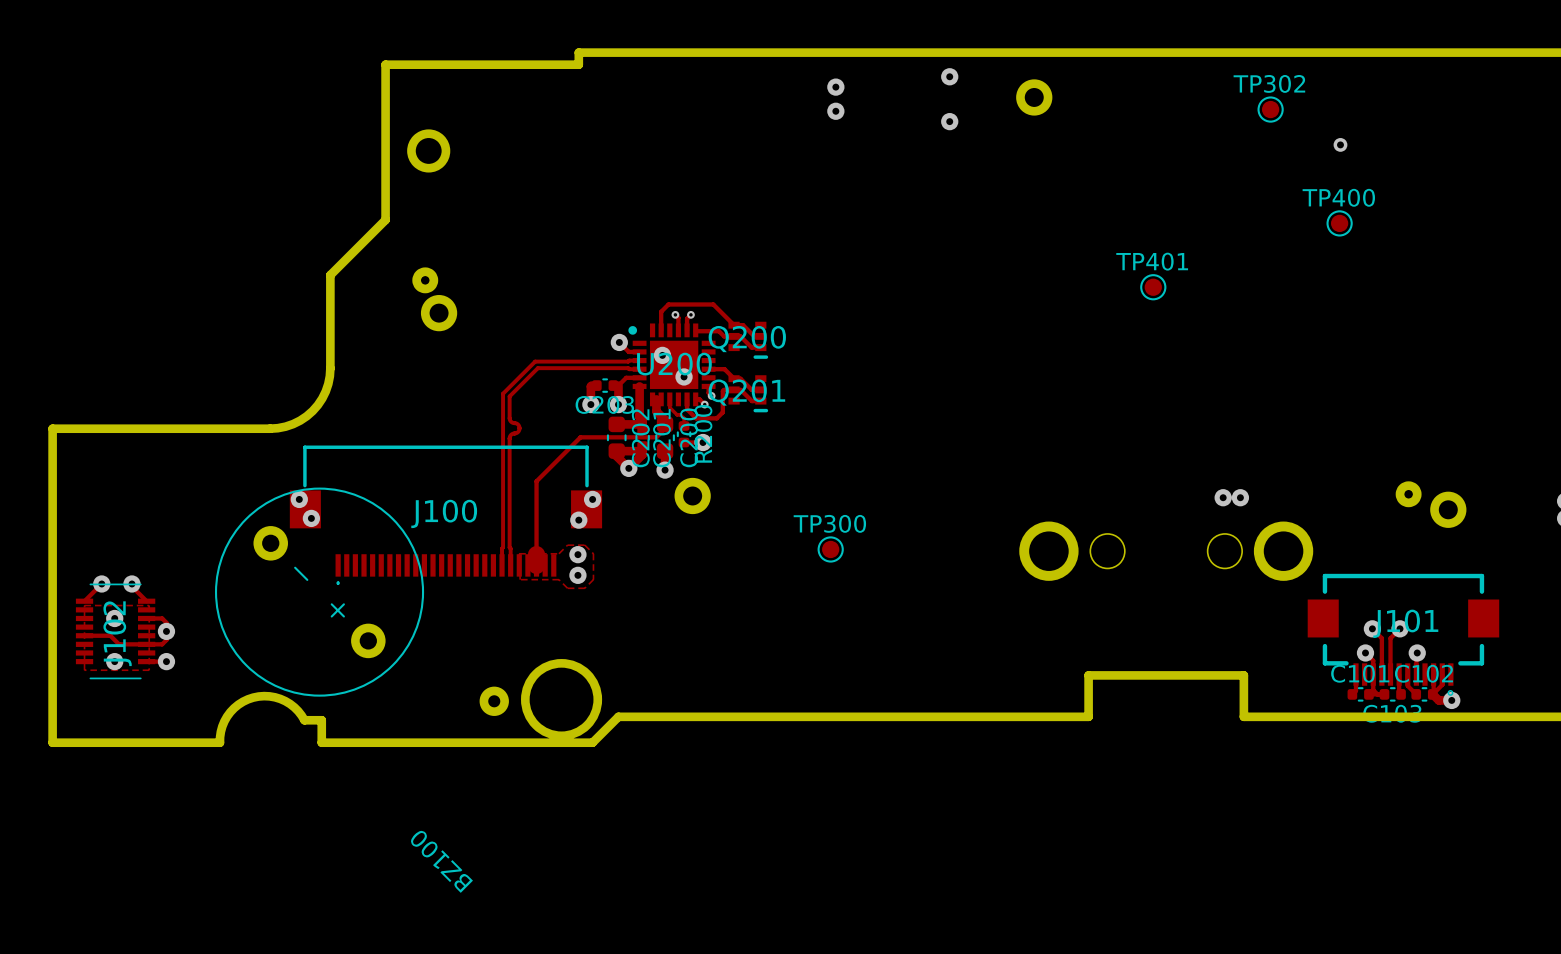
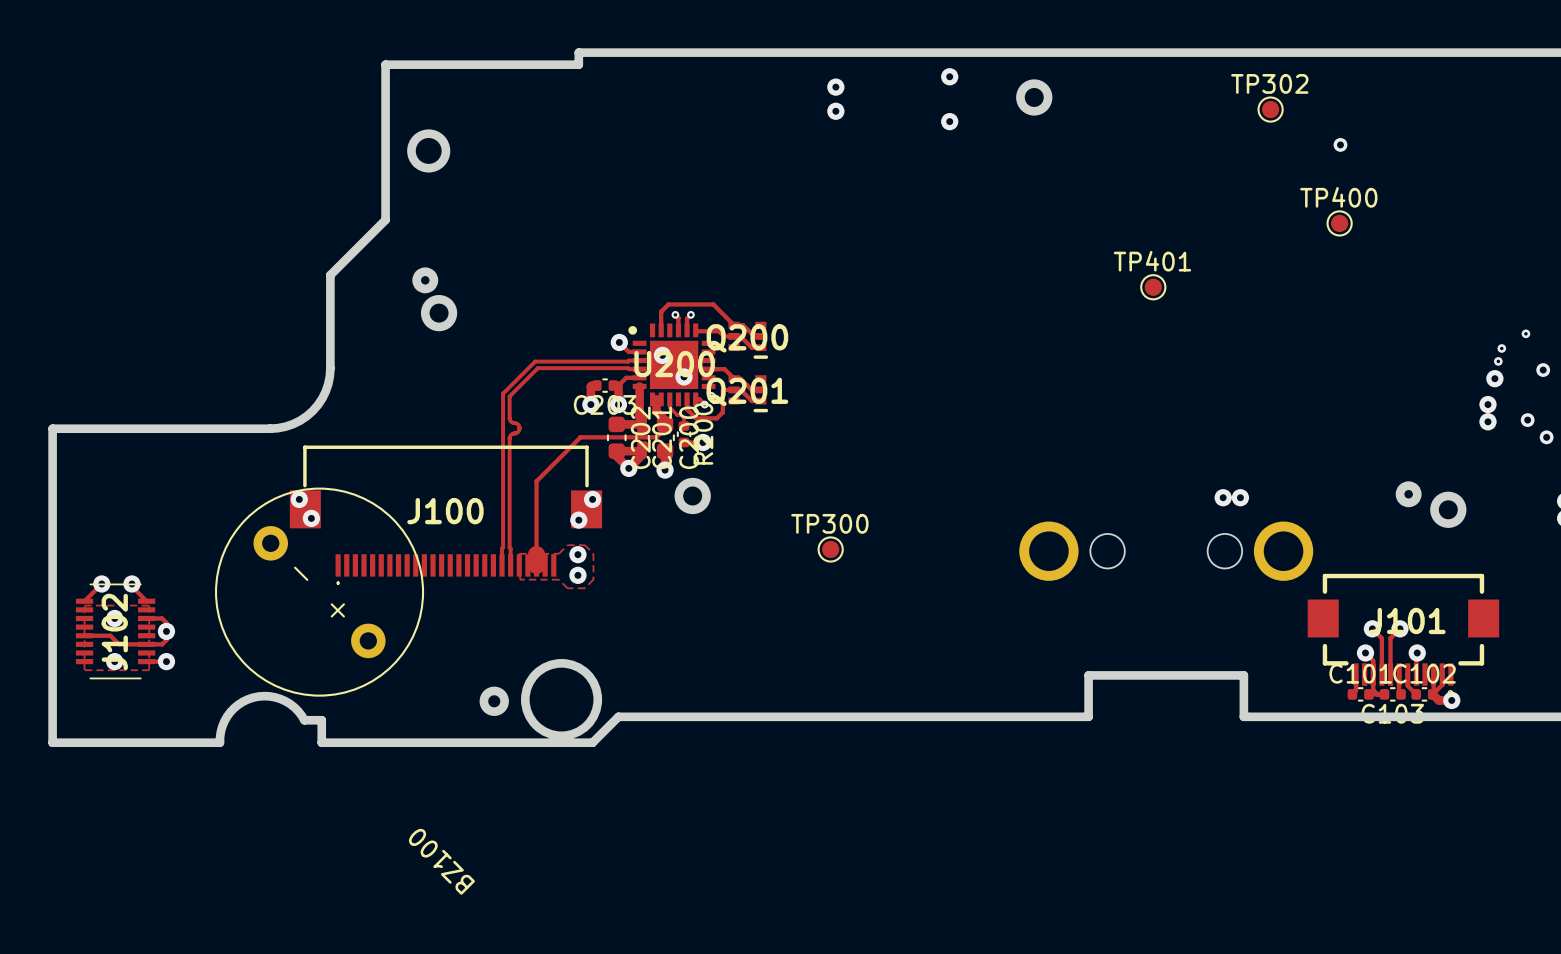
via: none -> (1525, 333)
via: none -> (1501, 348)
via: none -> (1498, 361)
via: none -> (1543, 370)
via: none -> (1494, 378)
via: none -> (1487, 404)
via: none -> (1527, 420)
via: none -> (1487, 421)
via: none -> (1546, 437)

